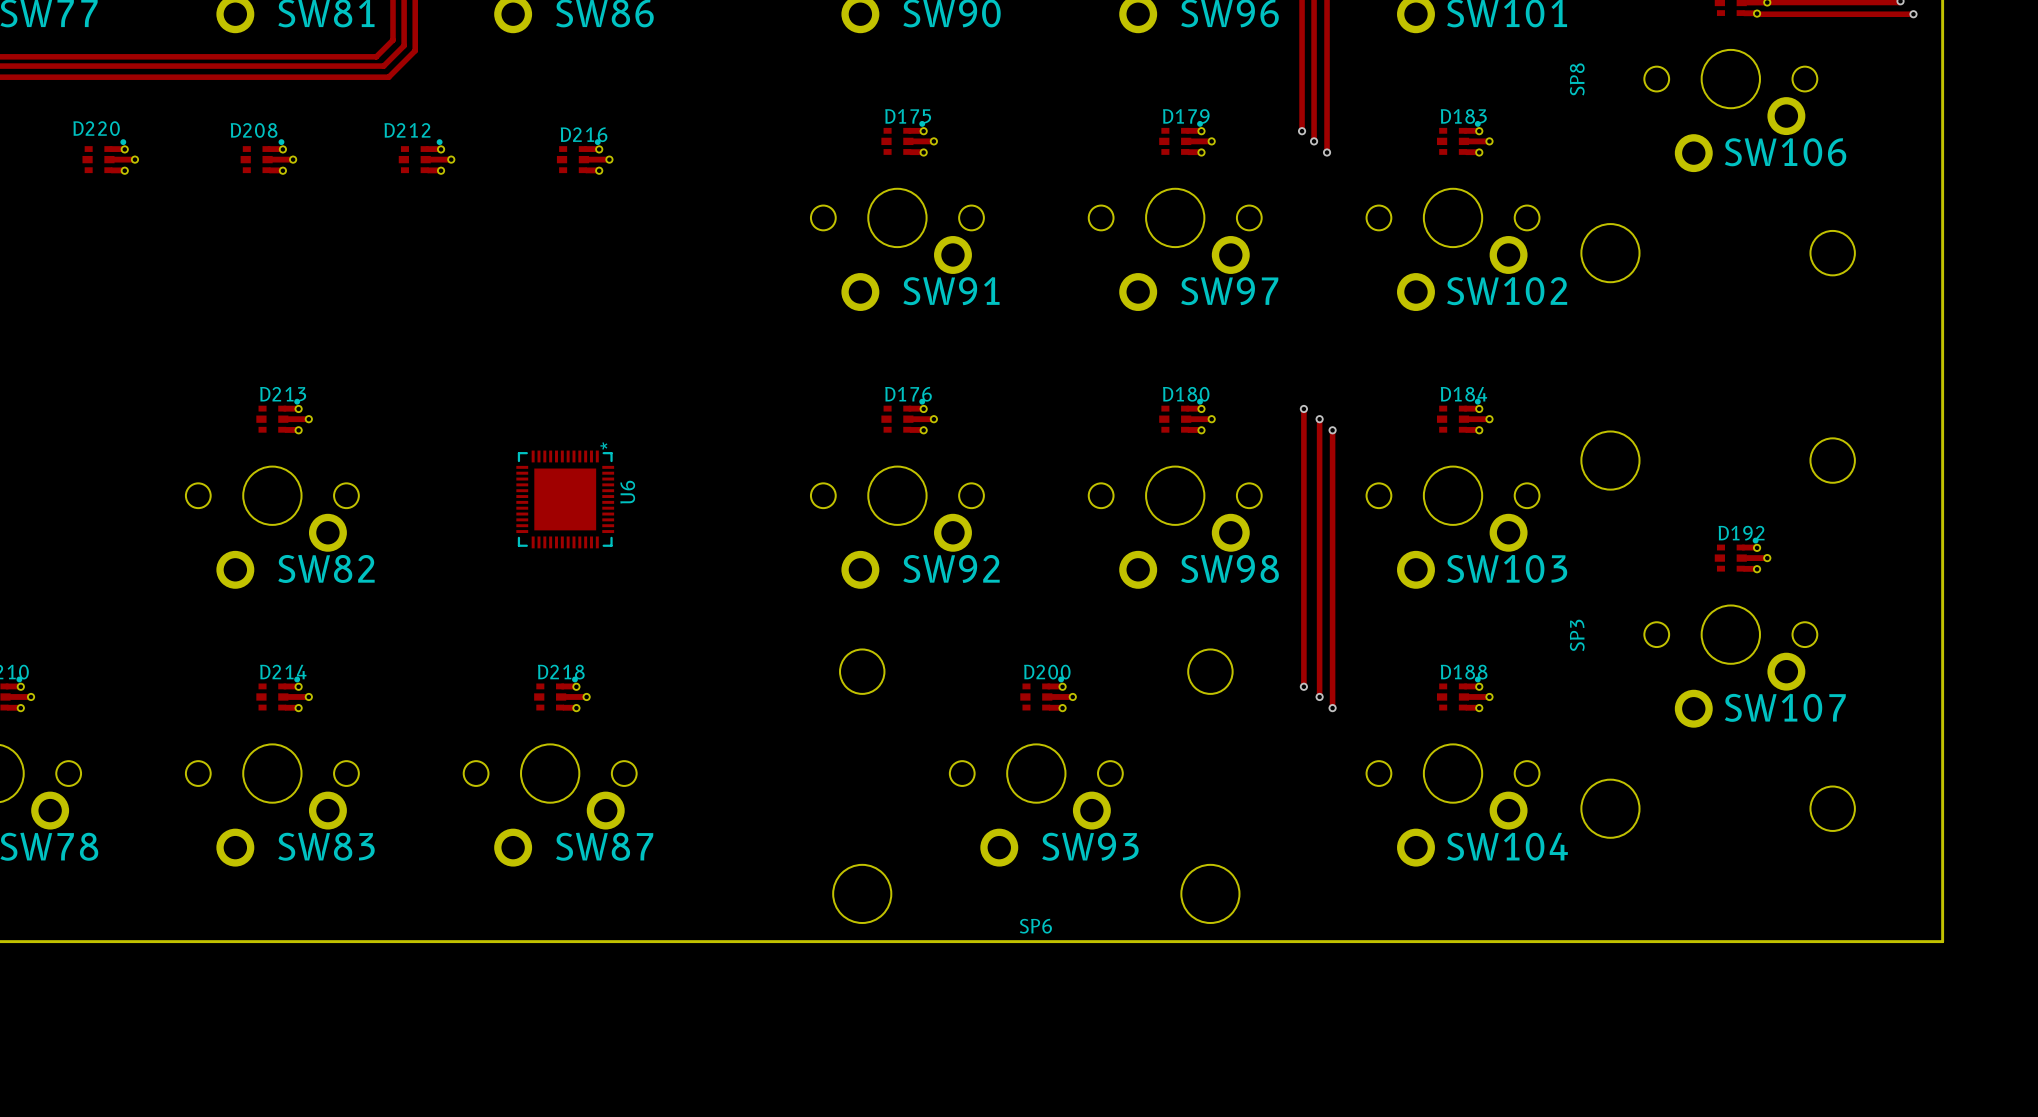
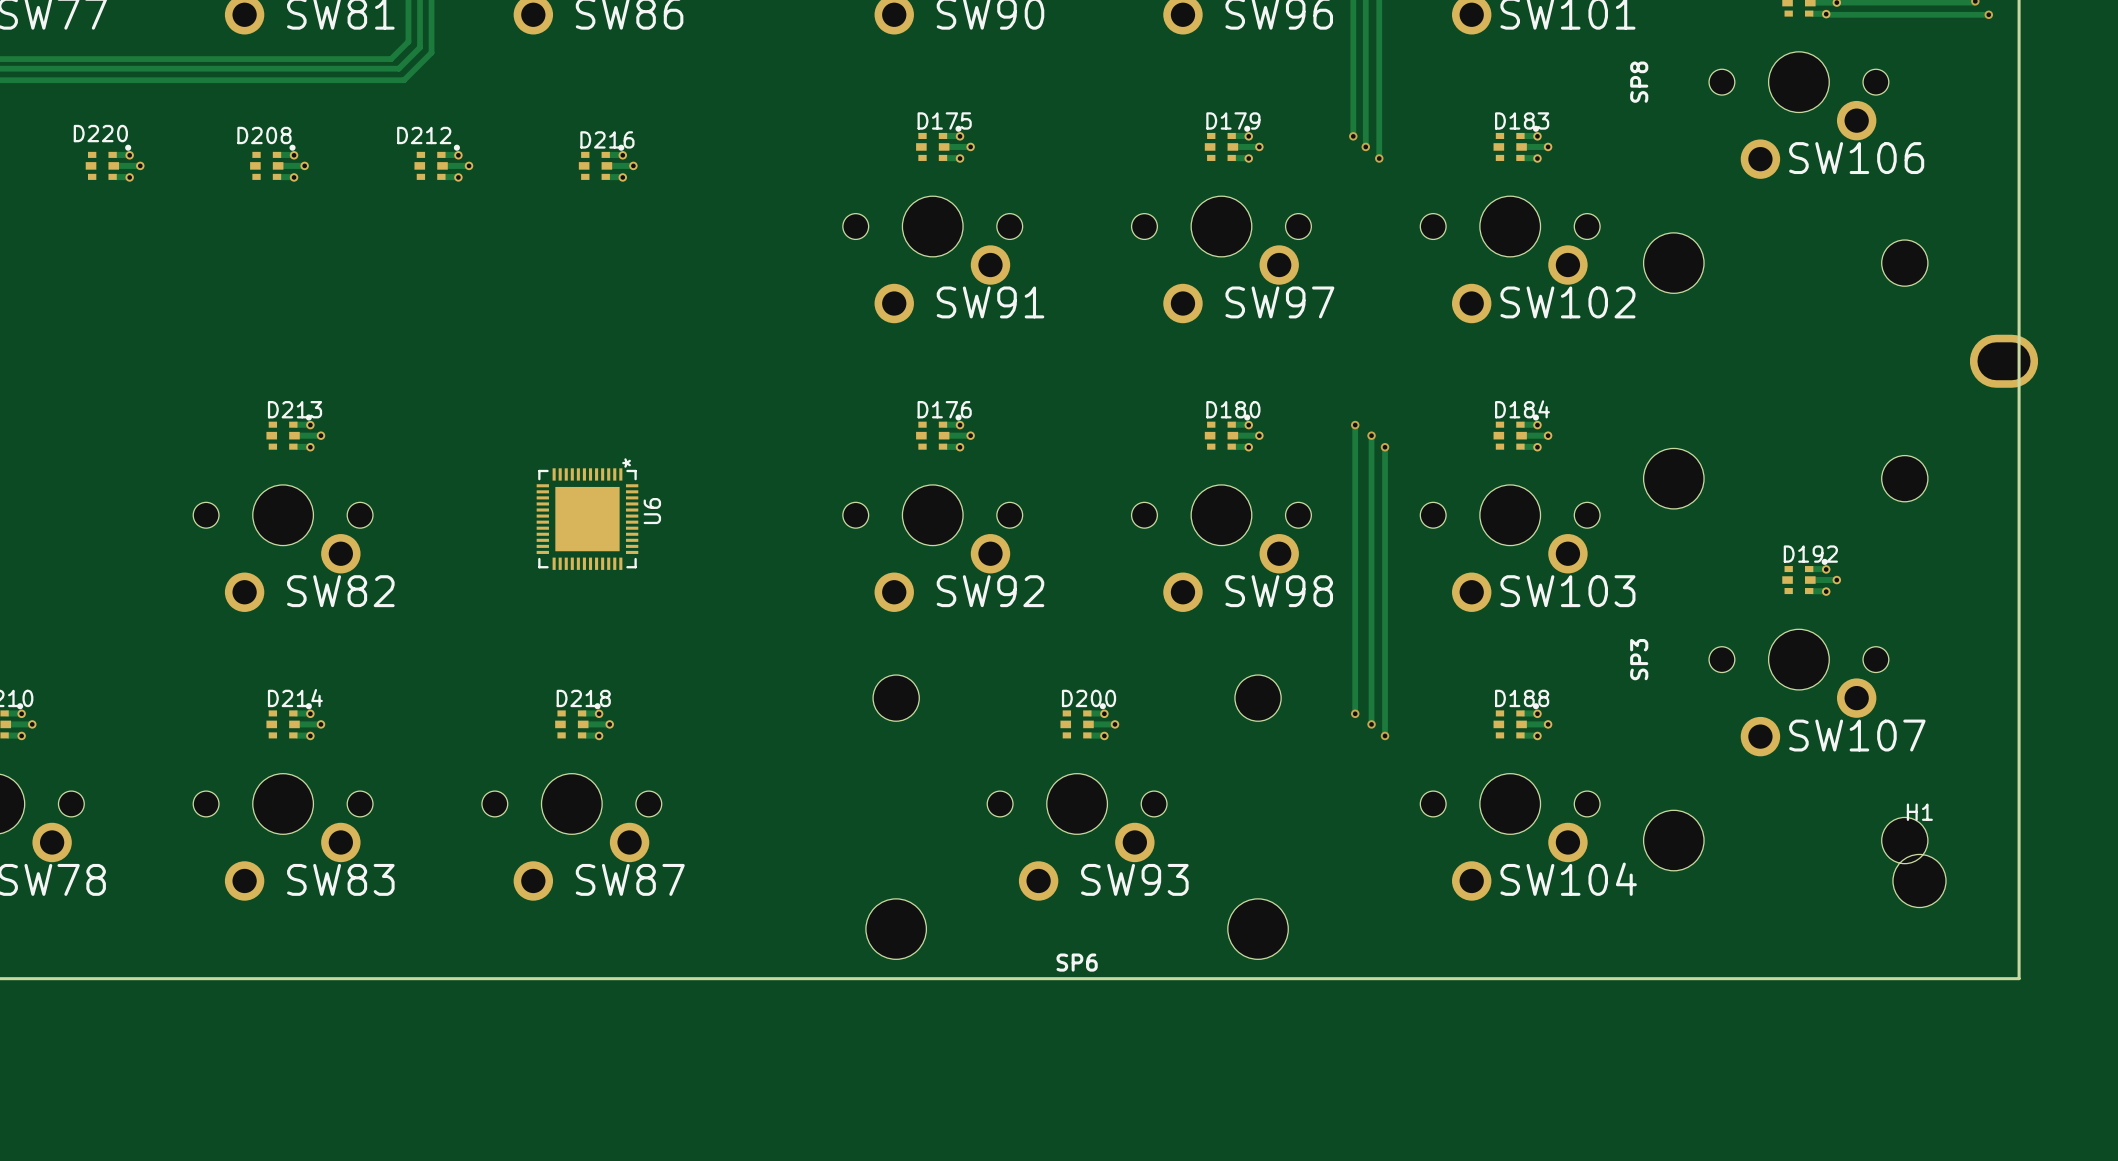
part: none -> (2004, 361)
H1: none -> (1919, 880)

